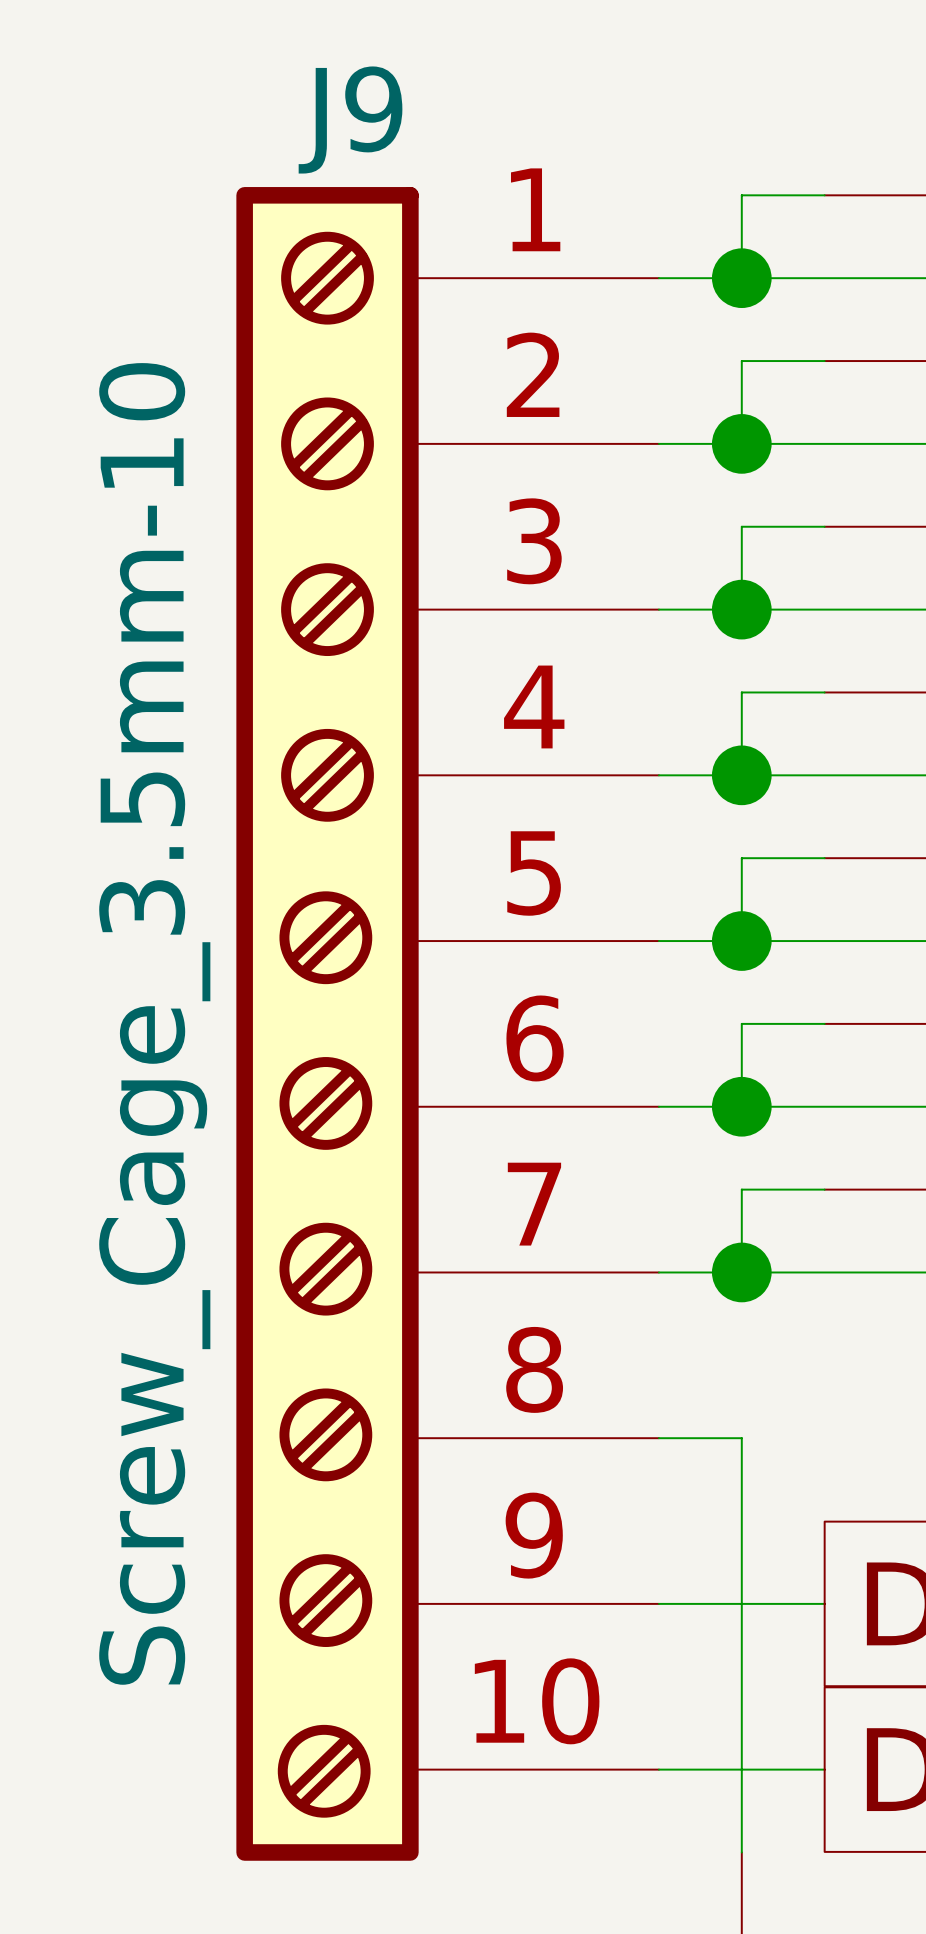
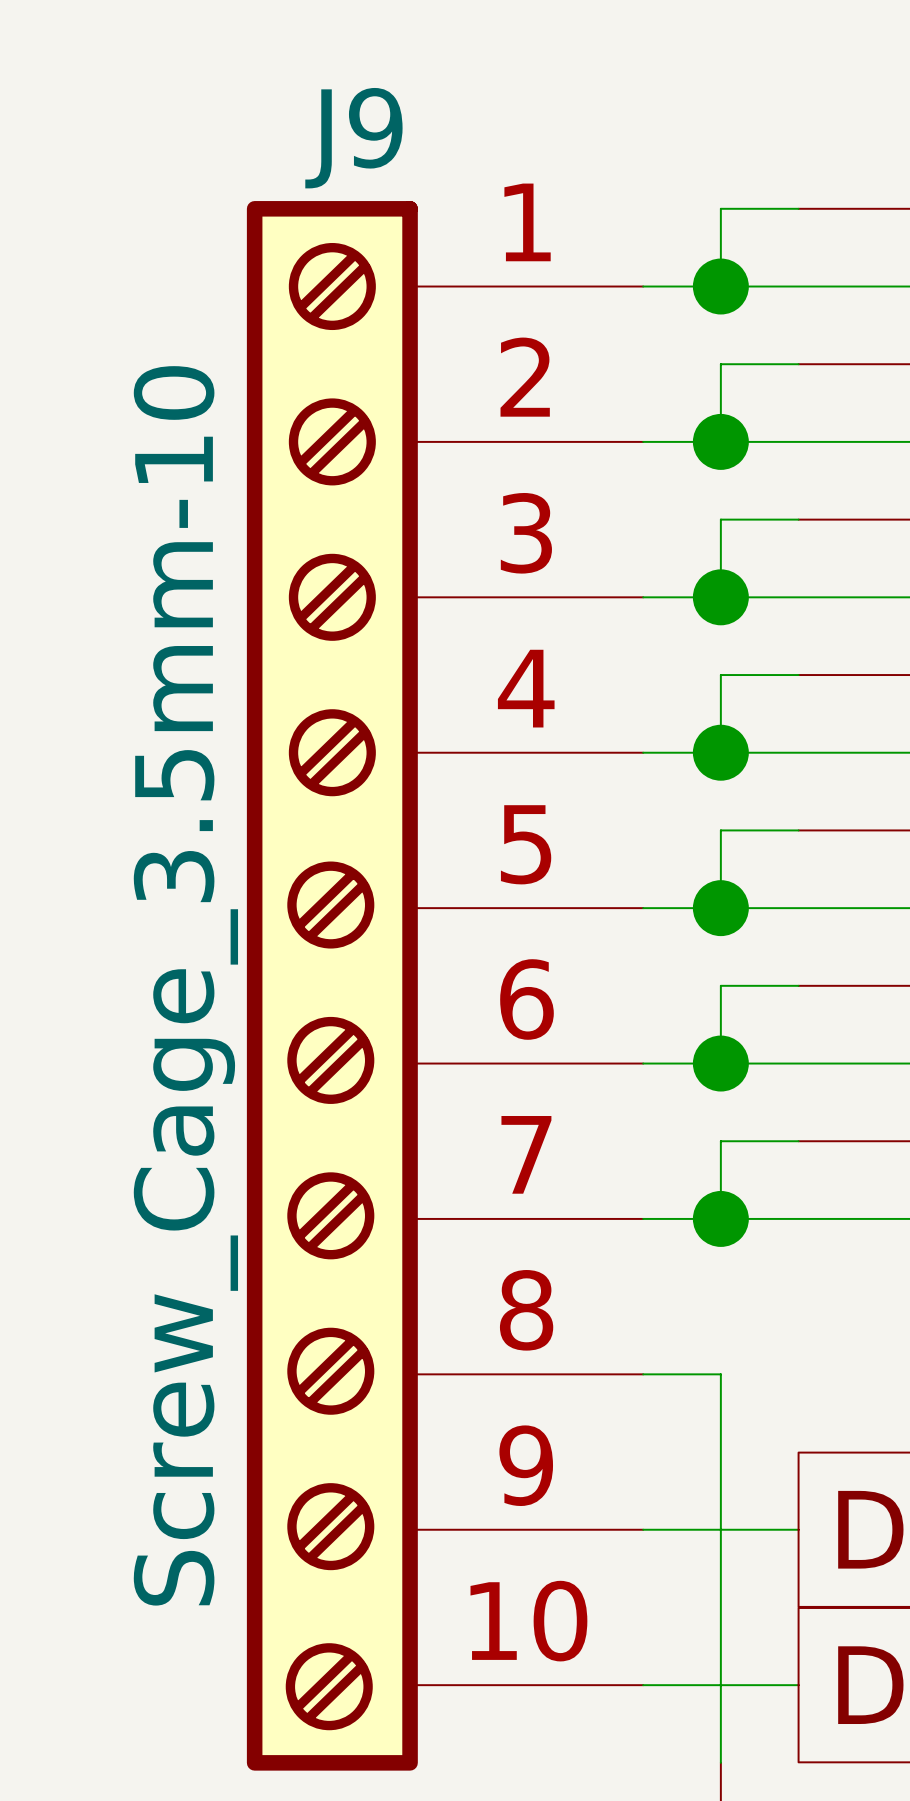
J9 value position: Screw_Cage_3.5mm-10 (154, 1023) -> Screw_Cage_3.5mm-10 (185, 985)

